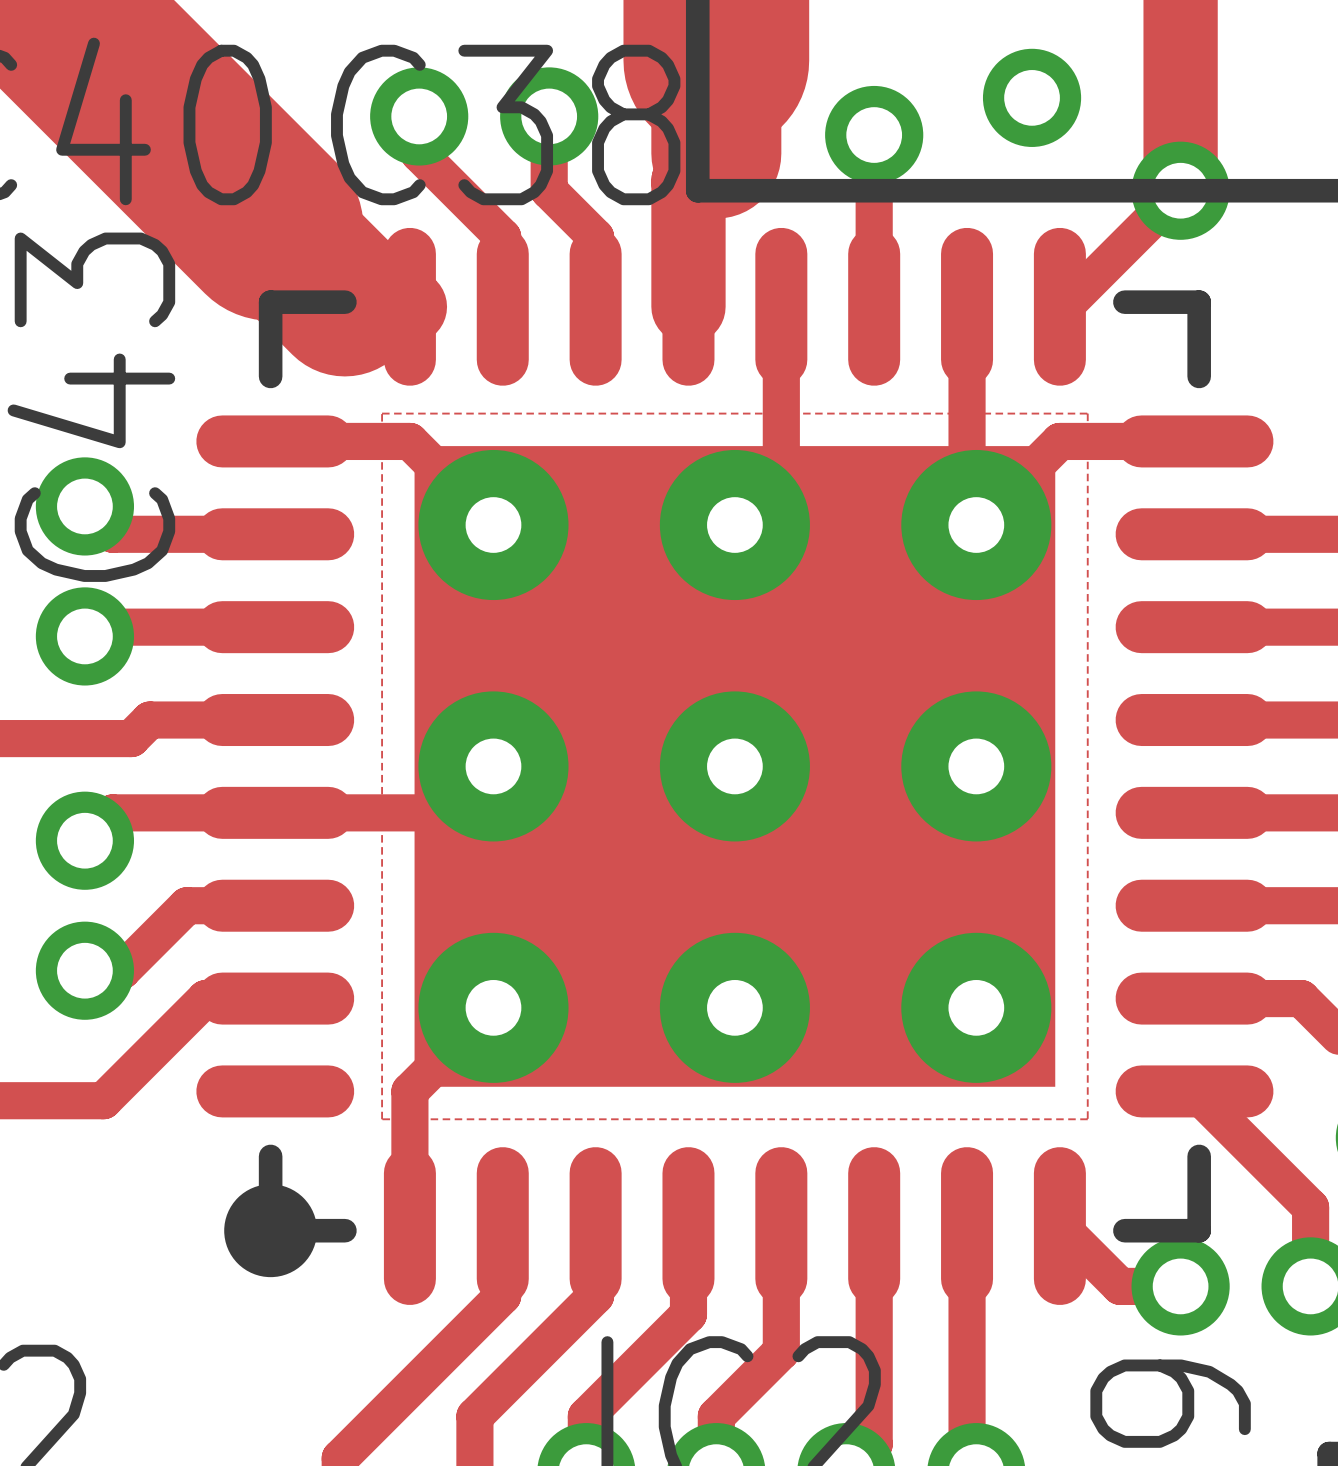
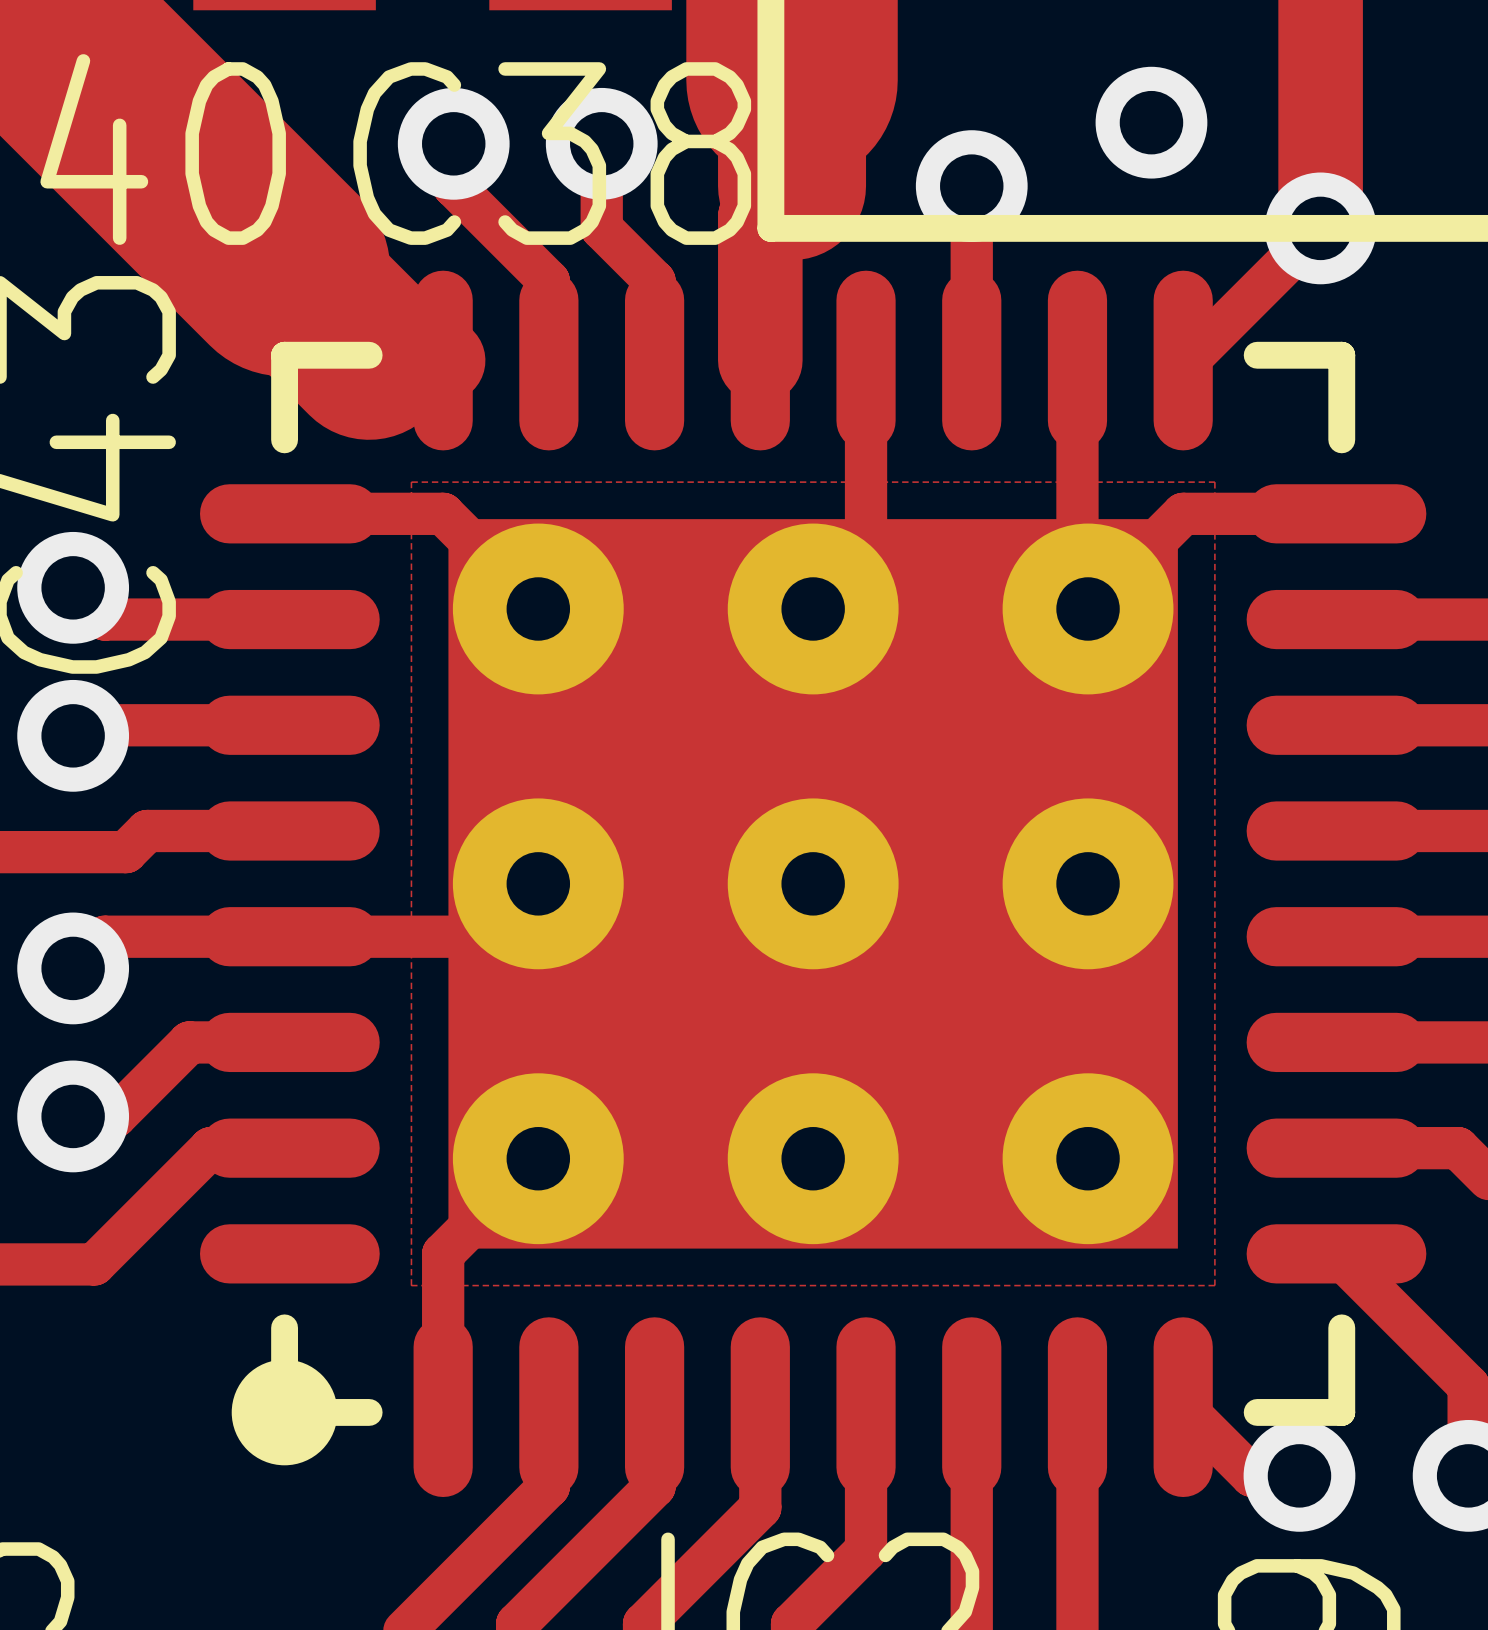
via position: (874, 135) -> (971, 186)
via position: (1180, 1286) -> (1299, 1475)

